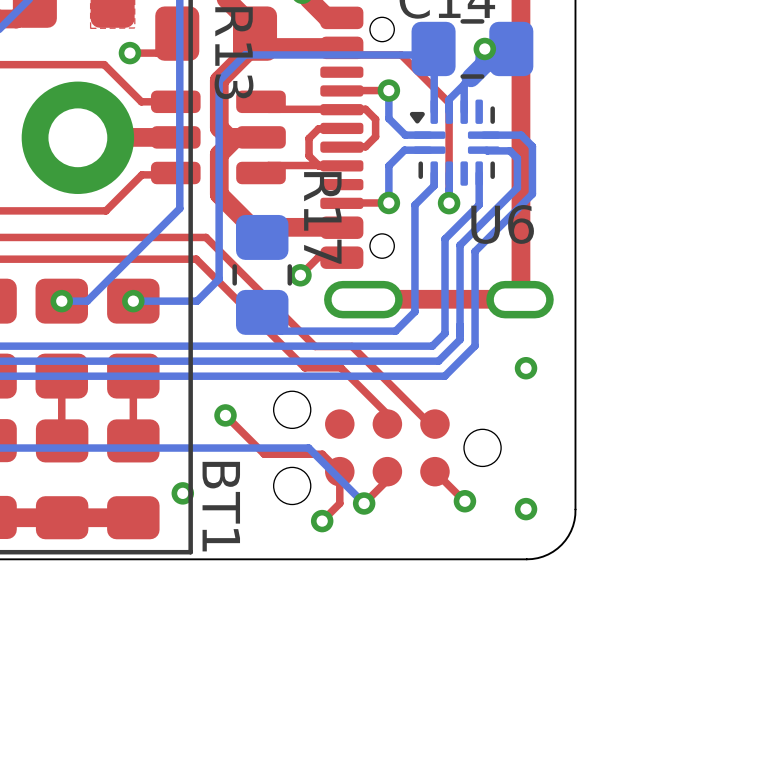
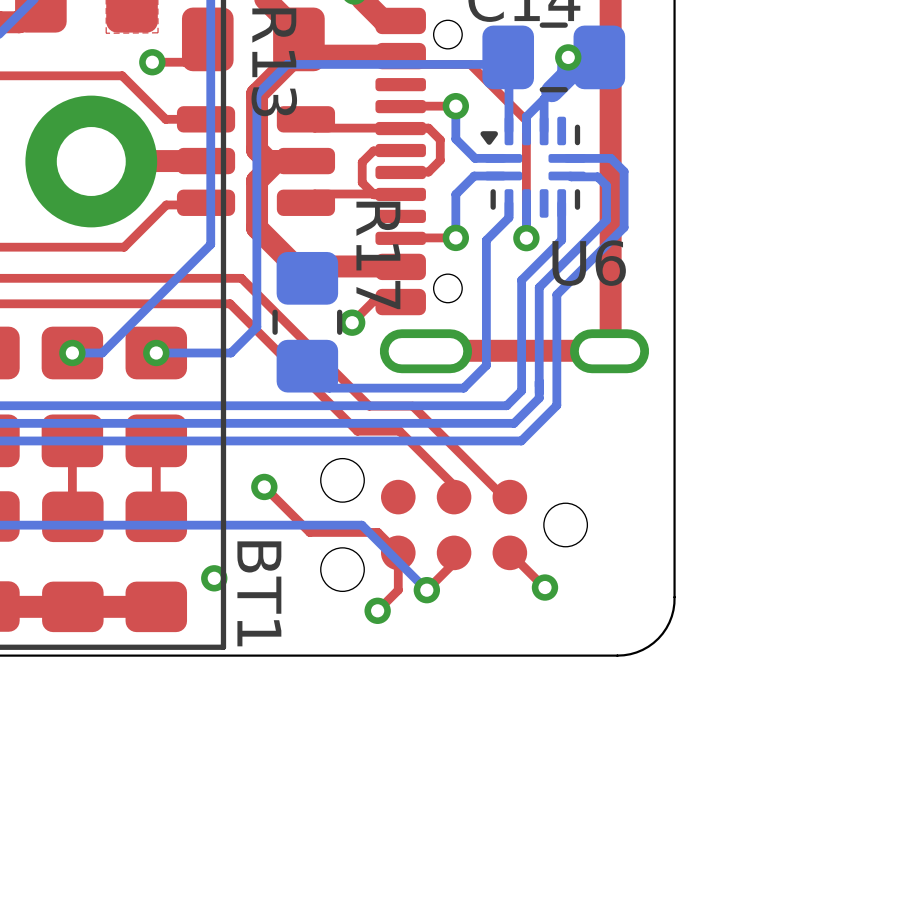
via: (526, 368) -> none
via: (526, 509) -> none

